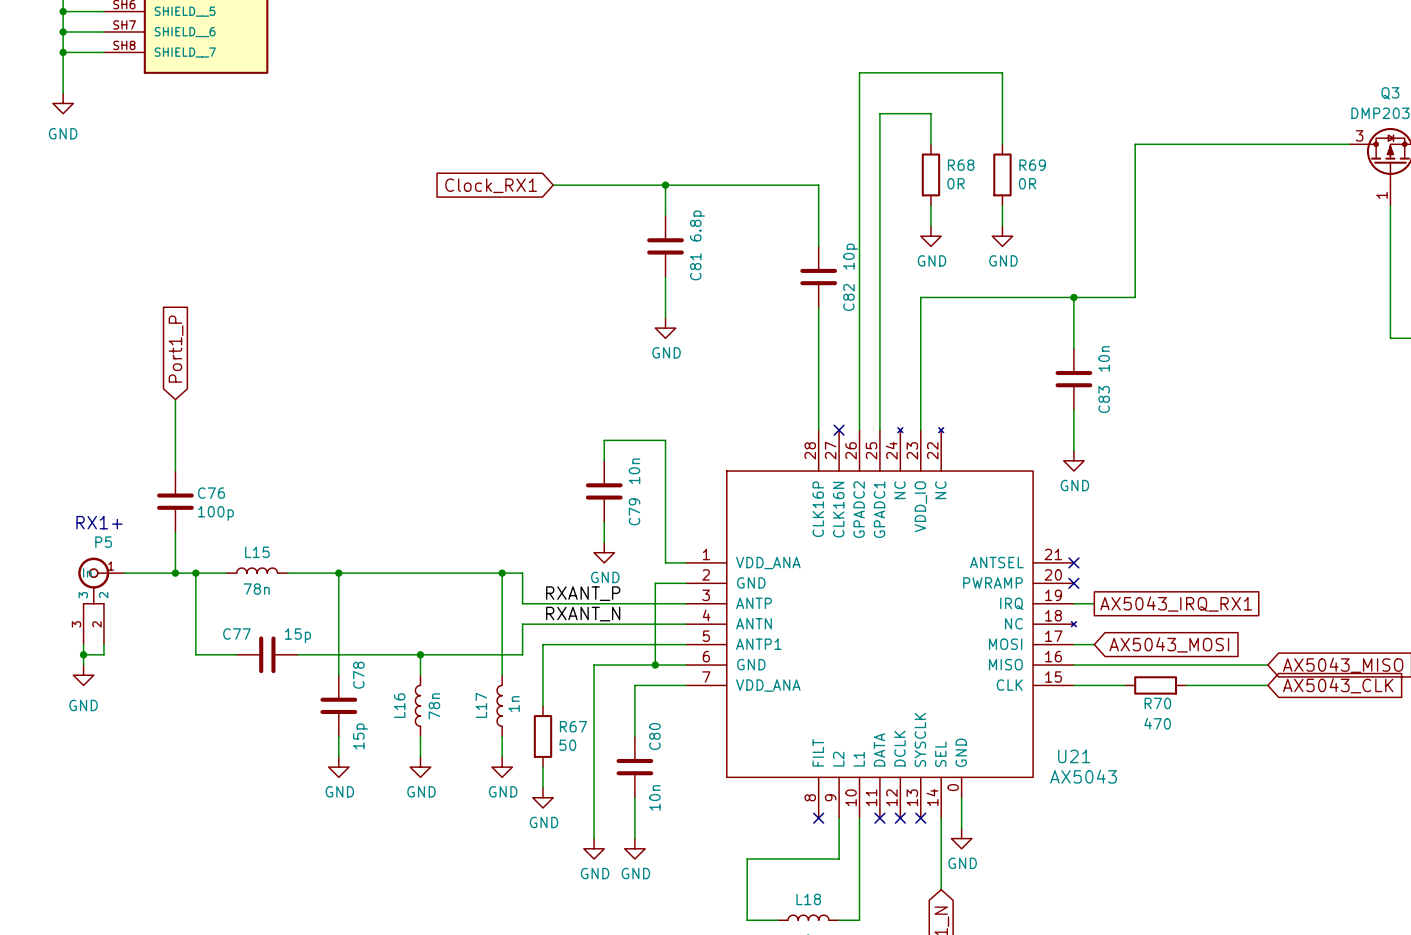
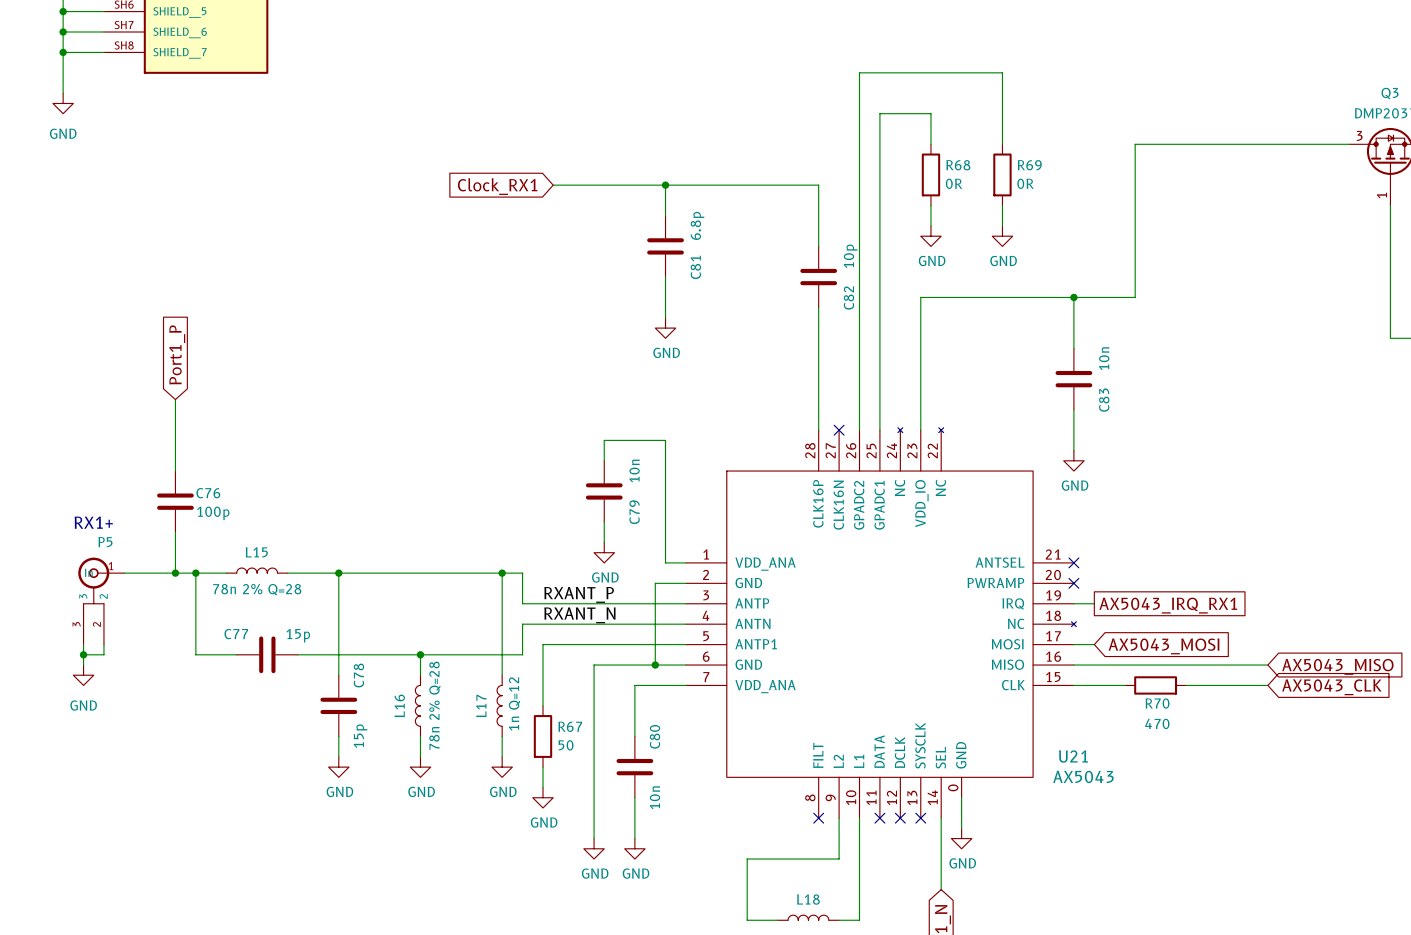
L15 value: 78n (256, 589) -> 78n 2% Q=28 (257, 589)
L17 value: 1n (514, 704) -> 1n Q=12 (514, 703)
L16 value: 78n (434, 706) -> 78n 2% Q=28 (434, 705)

